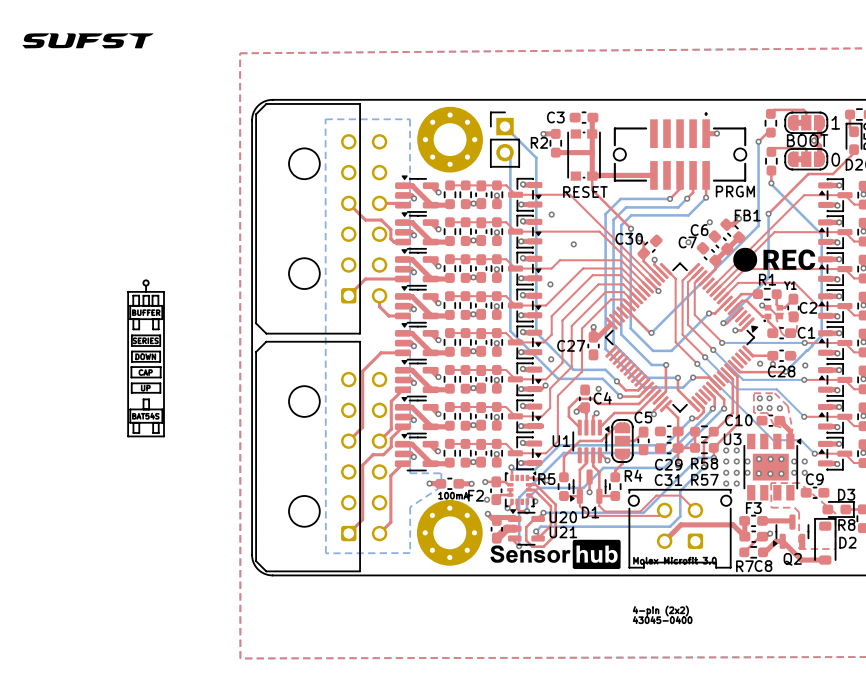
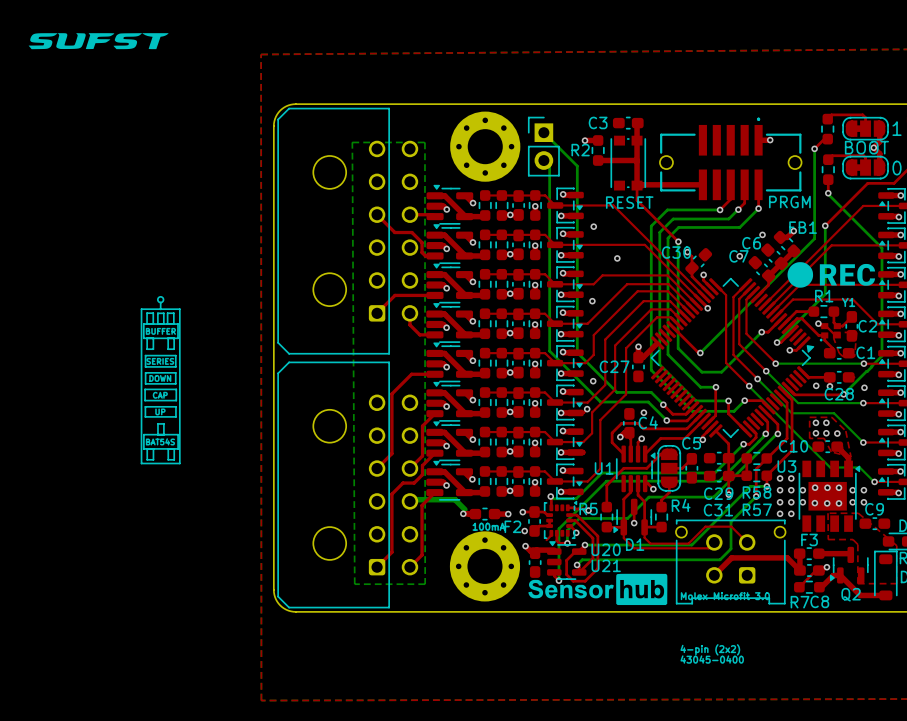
bottom zone outline: (325, 119) (410, 119) (410, 473) (441, 473) (441, 486) (410, 507) (410, 553) (325, 553) (325, 119) -> (352, 142) (354, 584) (425, 584) (424, 142) (352, 142)
bottom track: none -> (411, 499) (455, 499) (464, 509)
via: (507, 508) -> none
top track: (514, 528) (506, 528) (496, 538) -> none

